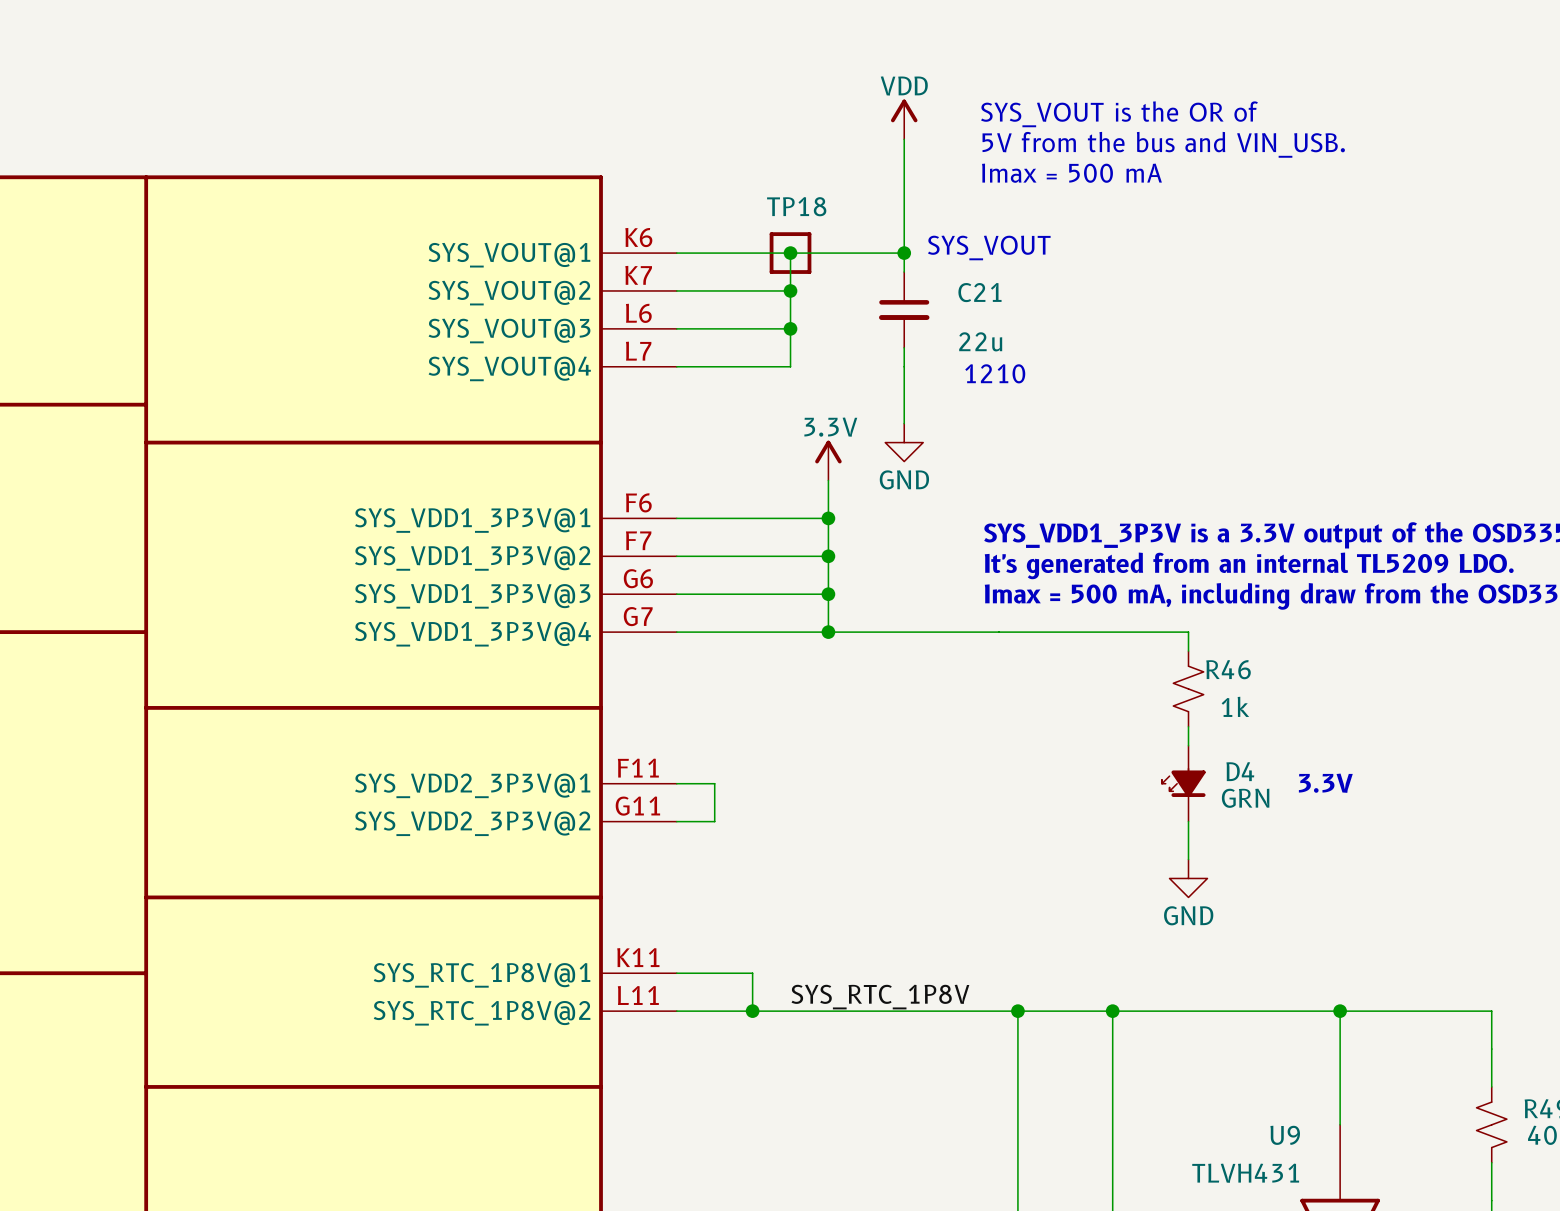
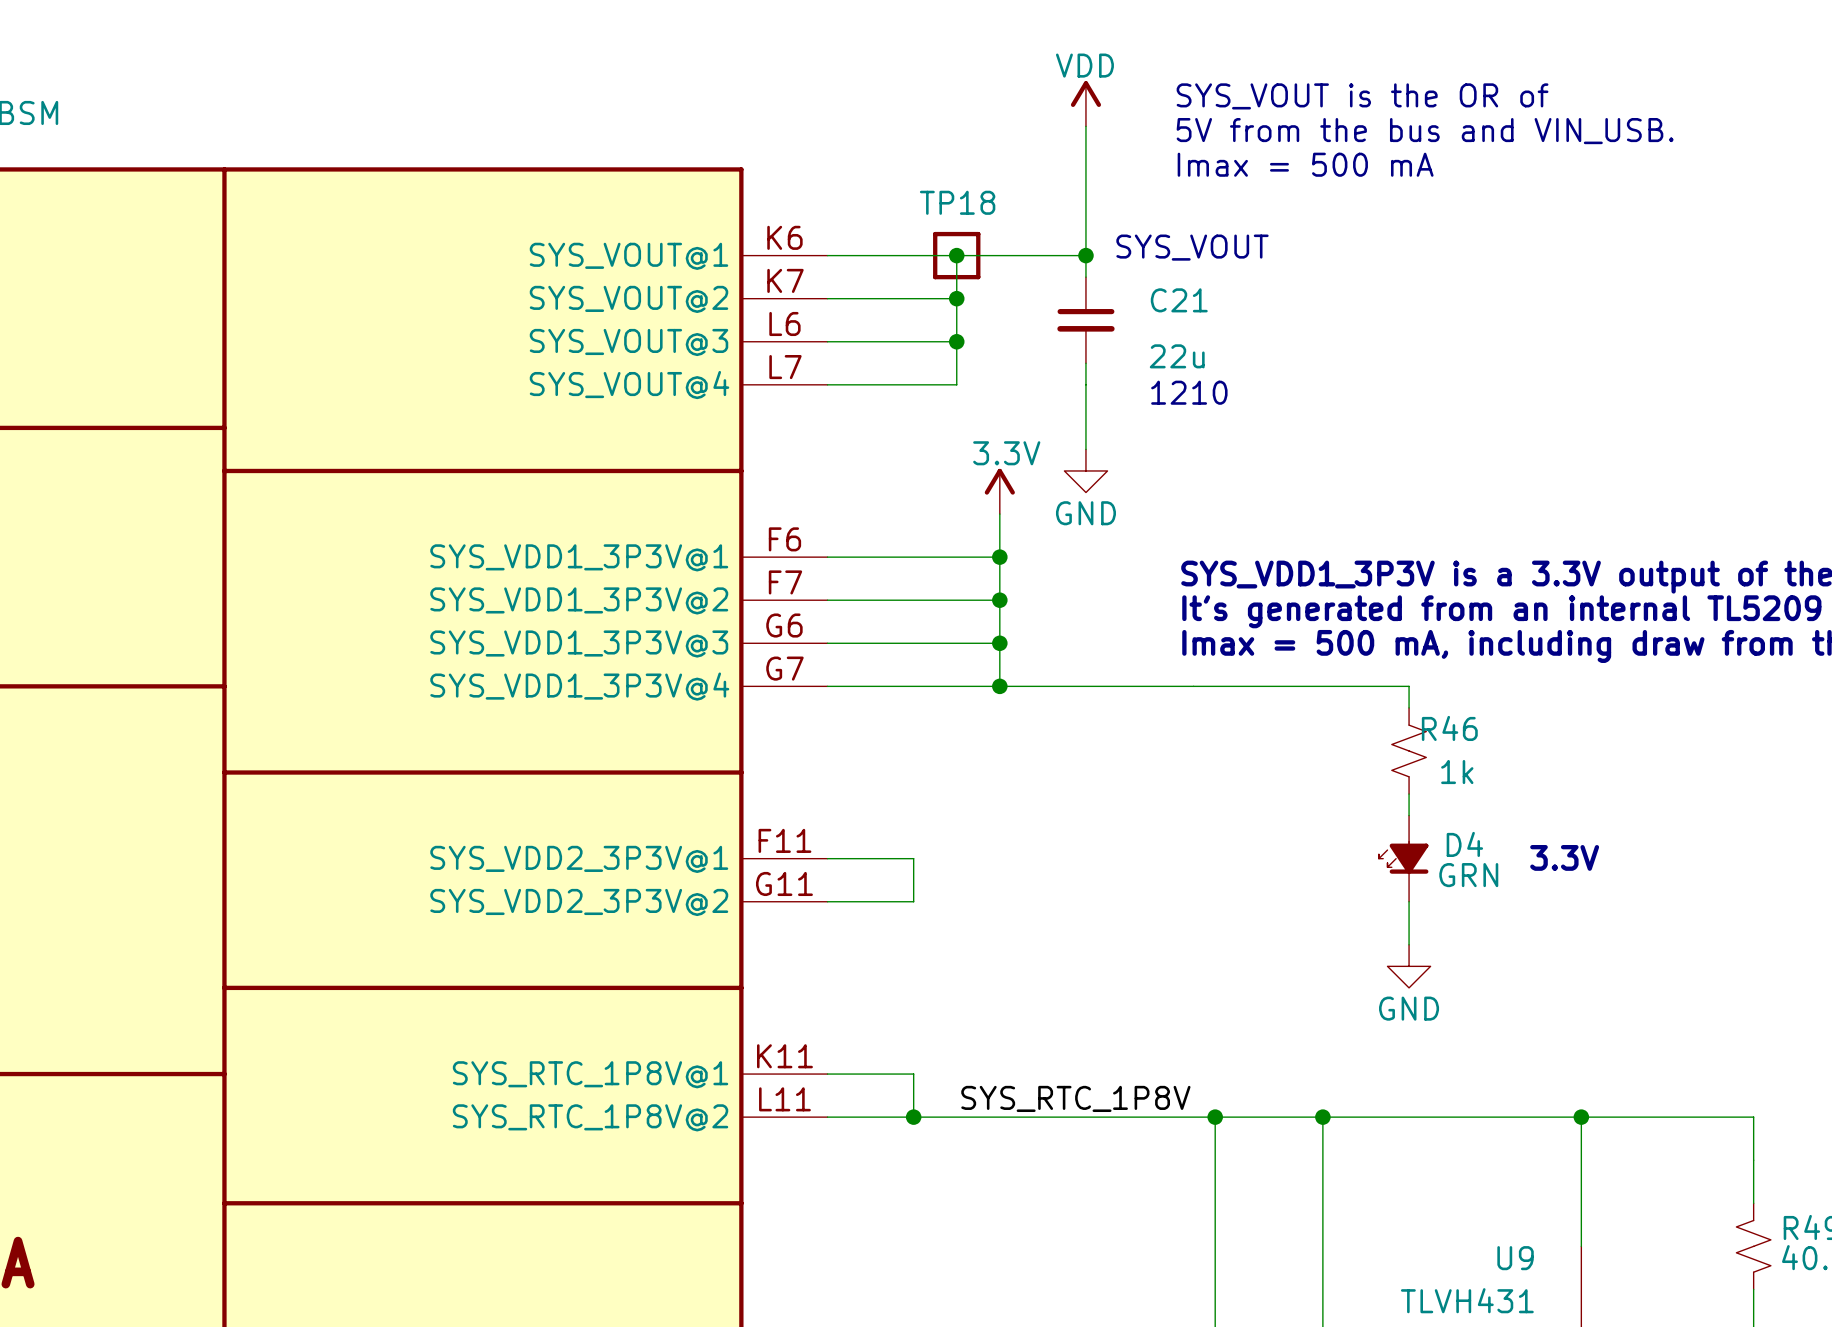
wire: (714, 783) (714, 821) -> (870, 858) (913, 858) (913, 901) (870, 901)

